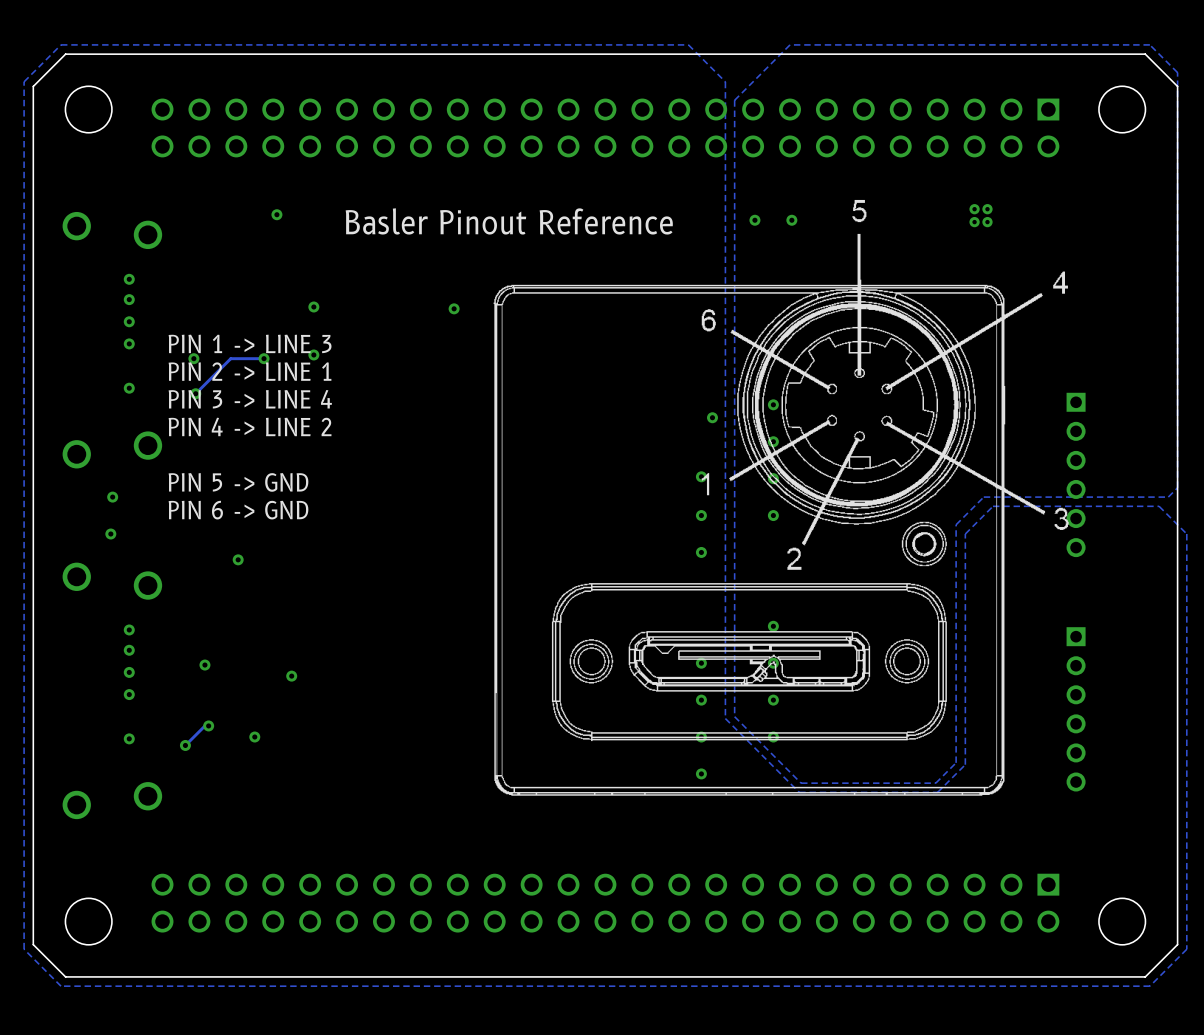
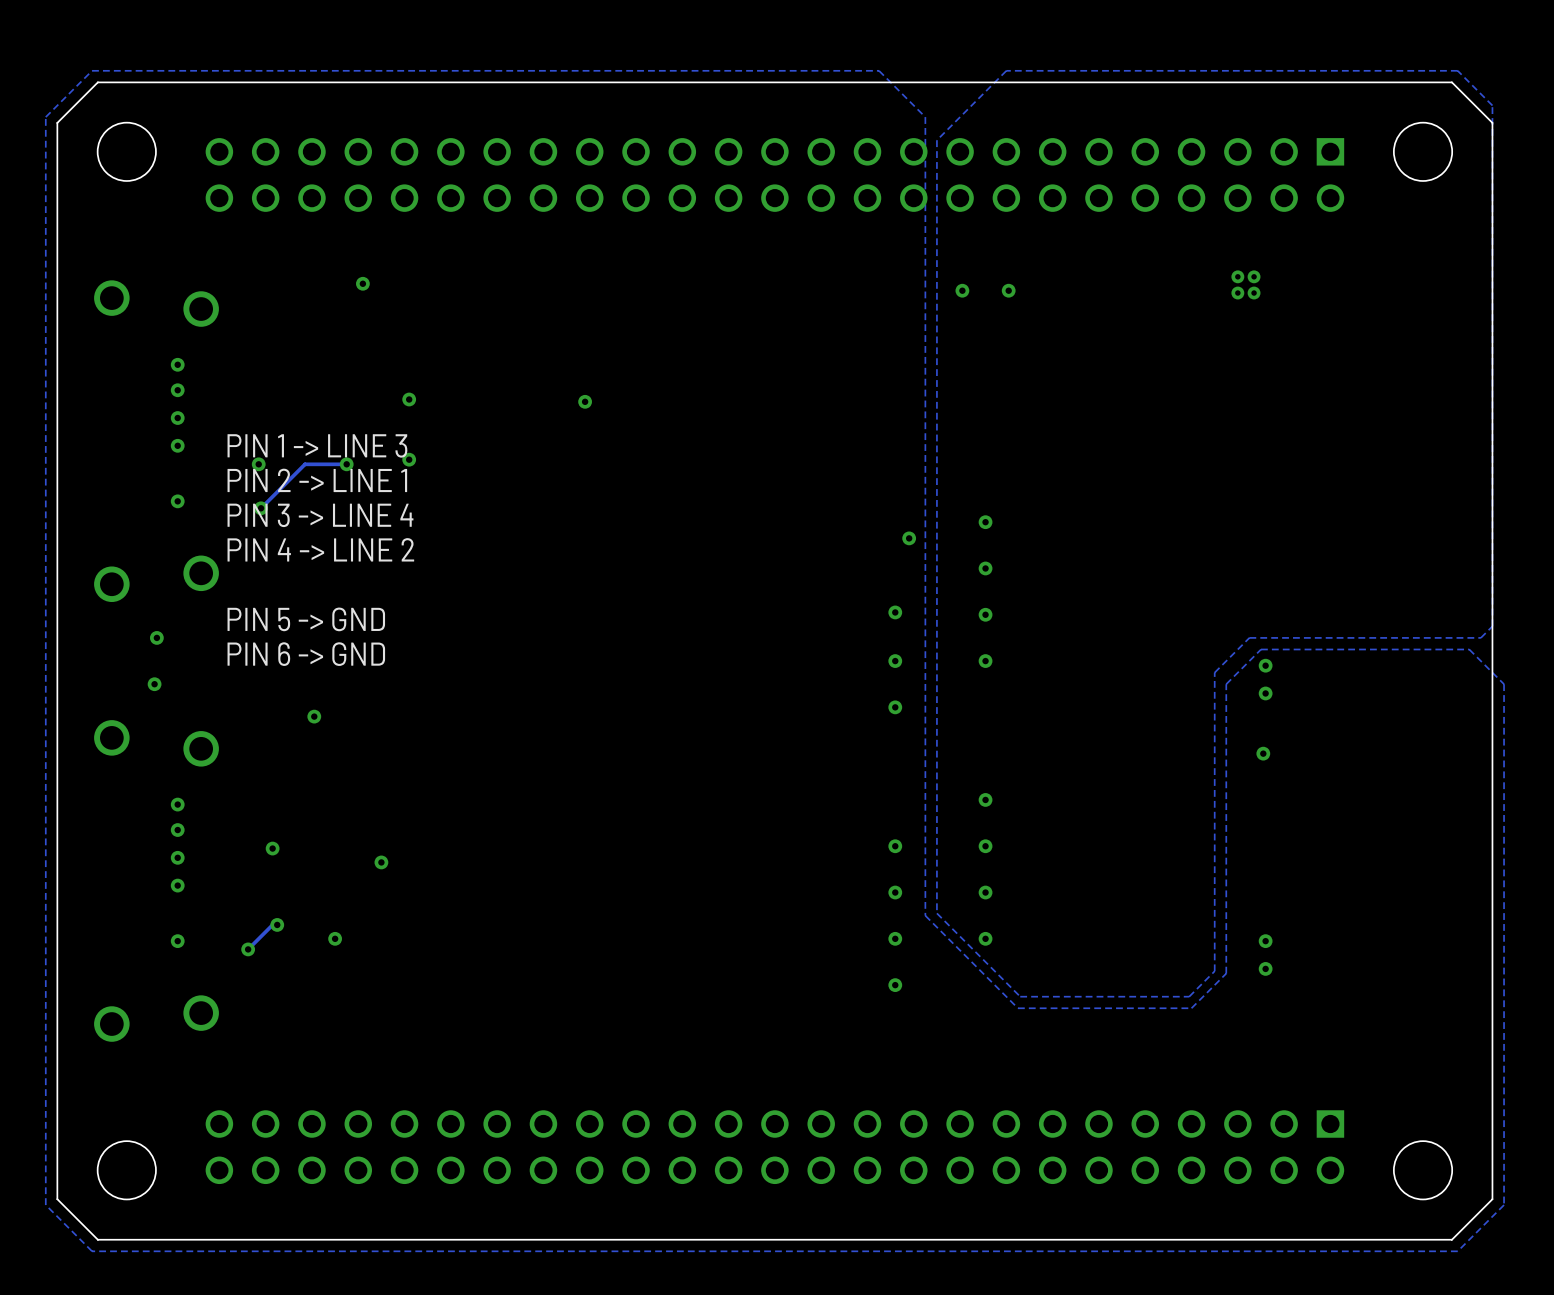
drawing: [493, 199, 1069, 796] -> none
text: Basler Pinout Reference (509, 221) -> none
drawing: [701, 473, 710, 496] -> none
part: (1076, 474) -> none
via: none -> (1265, 665)
via: none -> (1265, 693)
via: none -> (1263, 753)
part: (1076, 709) -> none
via: none -> (1265, 941)
via: none -> (1265, 968)

